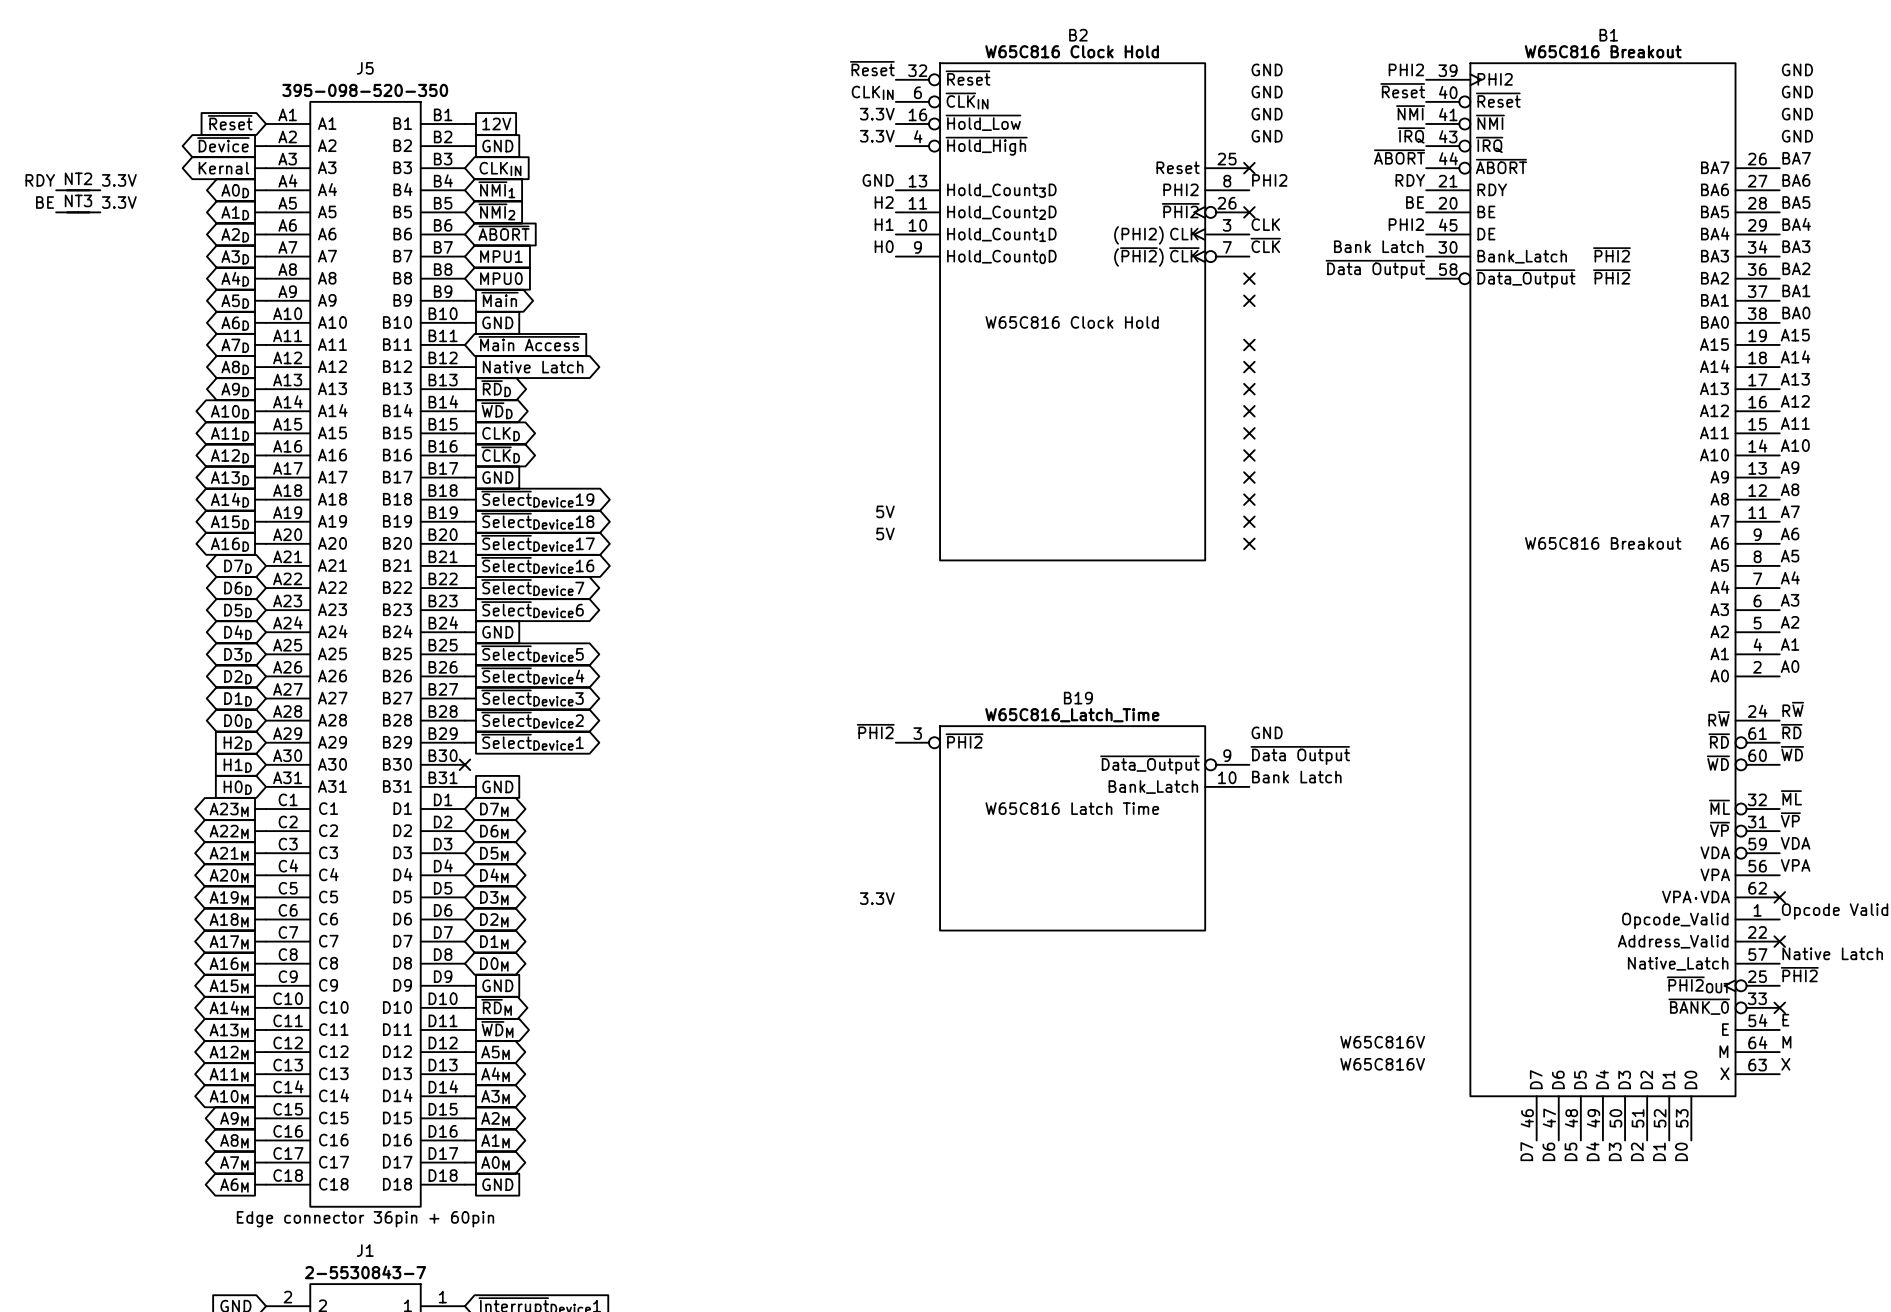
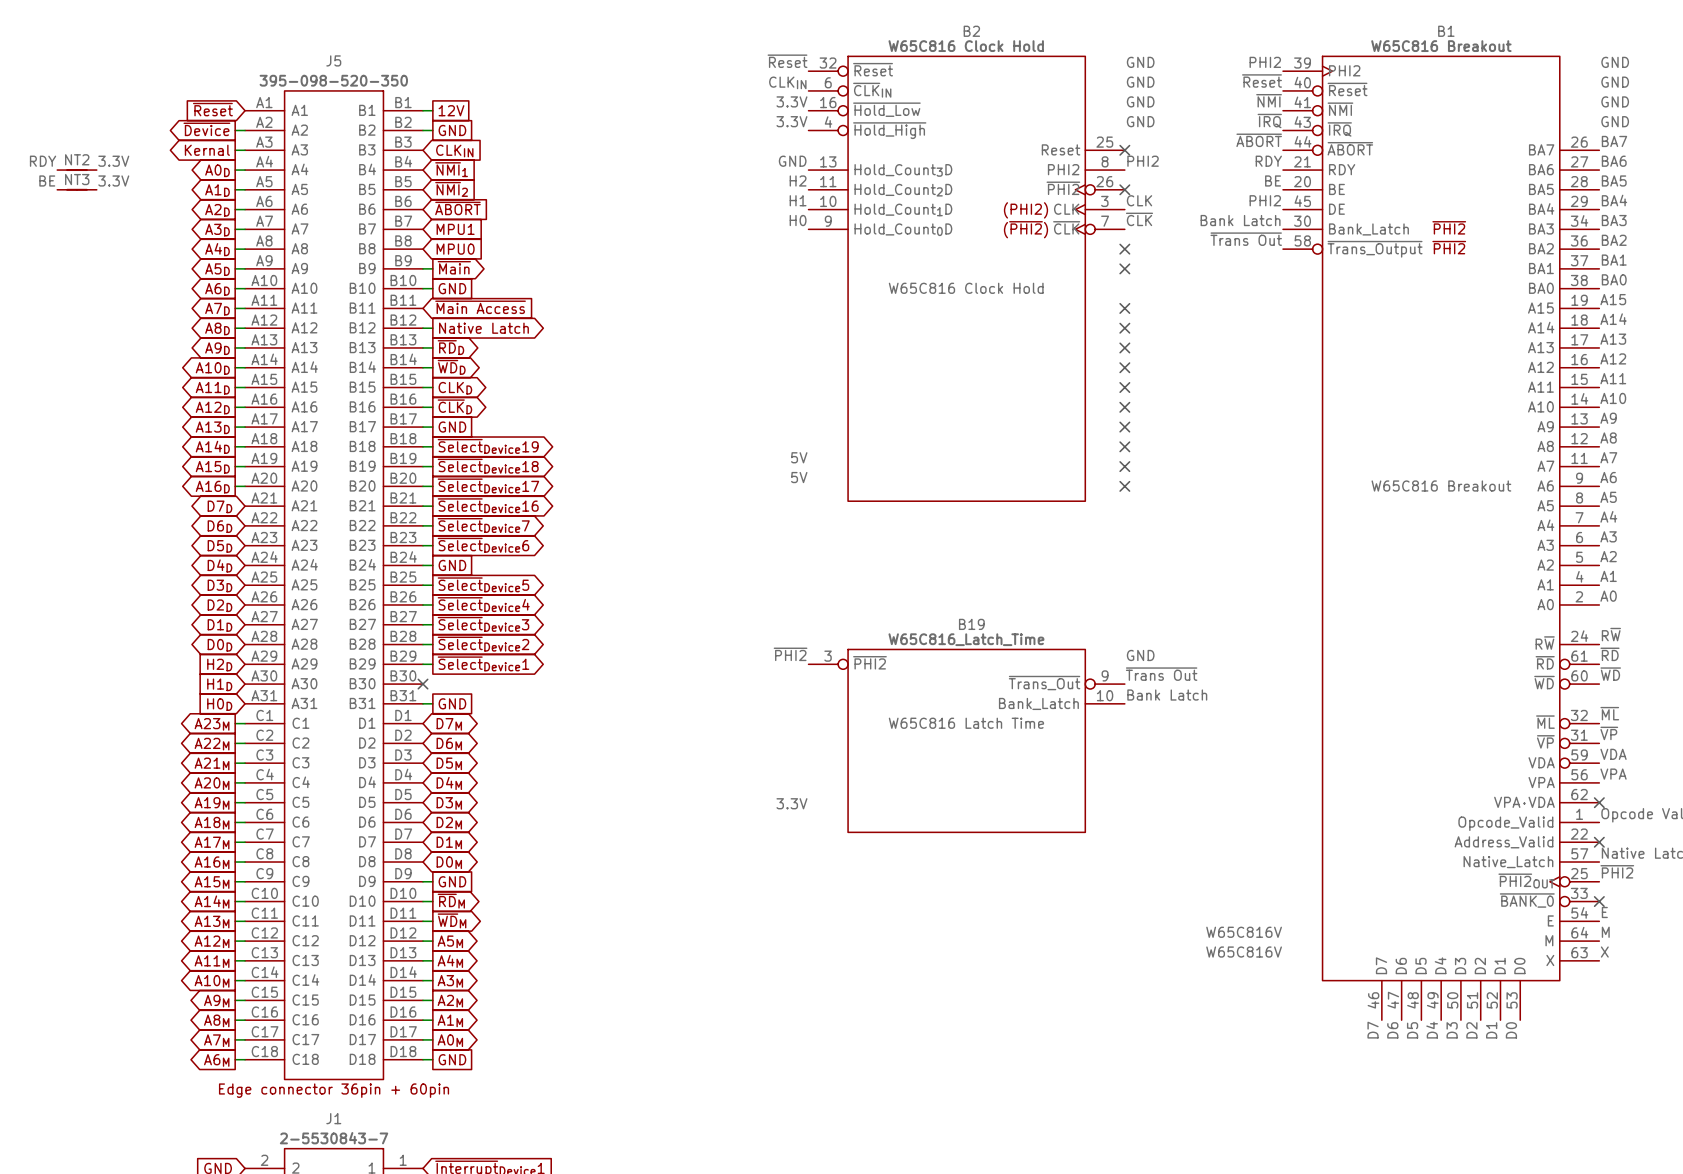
label: ~{Data Output} (1375, 269) -> ~{Trans Out} (1246, 239)
B1 pin name: ~{Data_Output} (1525, 278) -> ~{Trans_Output} (1375, 249)
label: ~{Data Output} (1300, 755) -> ~{Trans Out} (1161, 674)
B19 pin name: ~{Data_Output} (1149, 764) -> ~{Trans_Out} (1044, 683)

